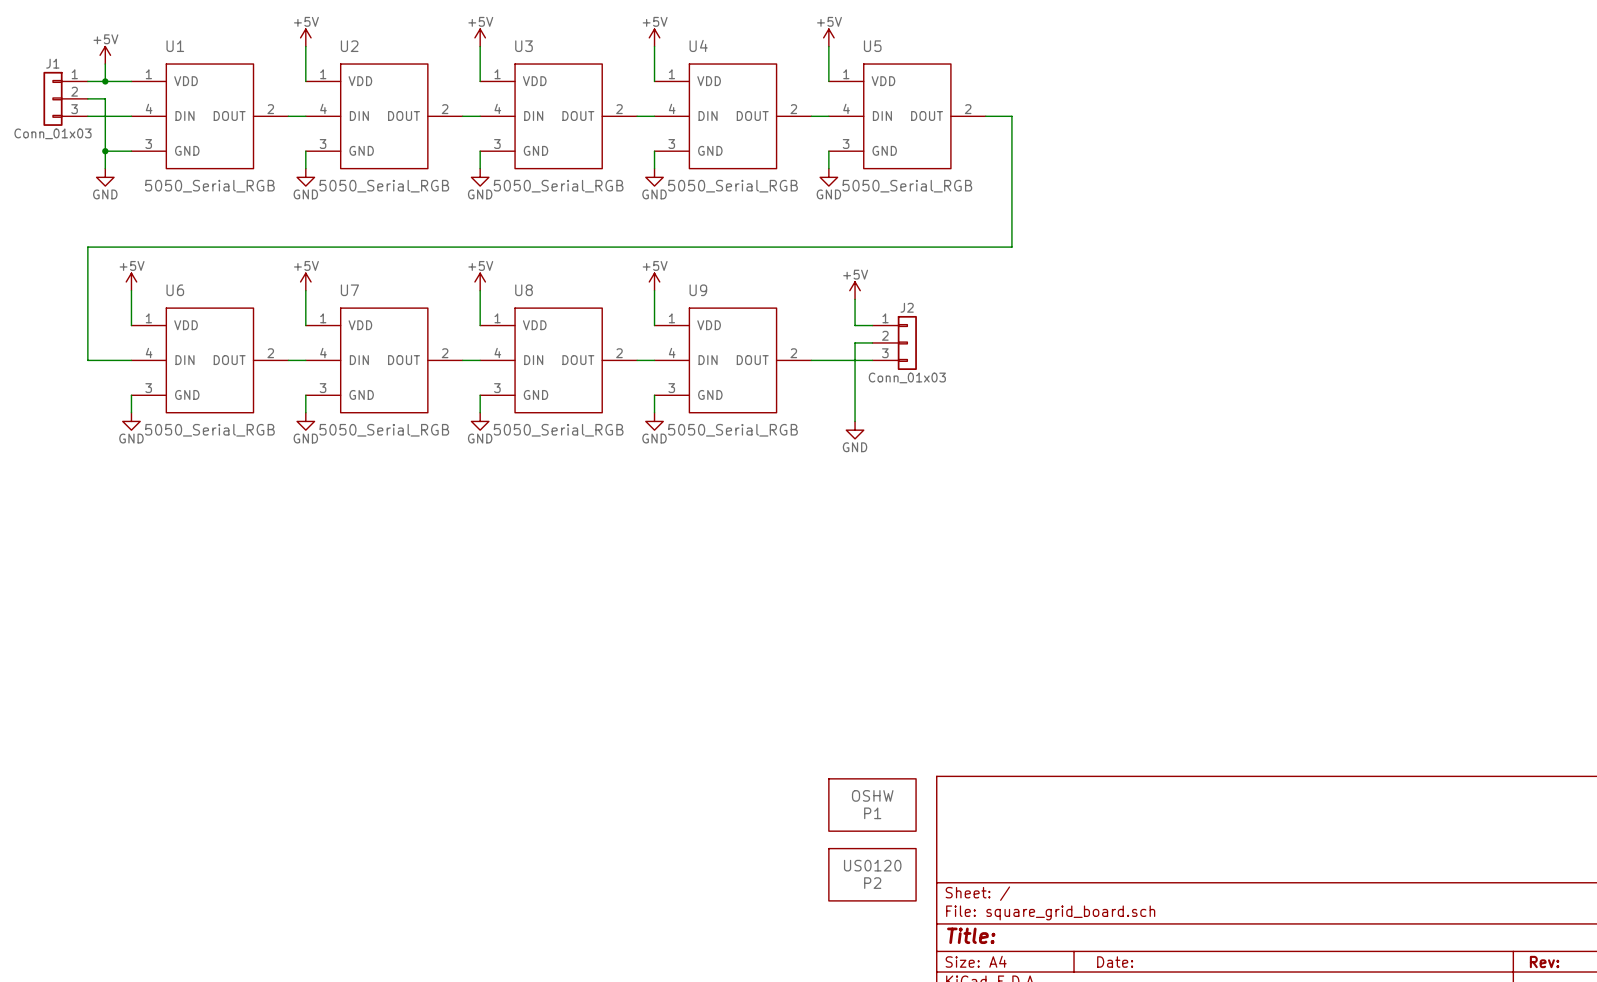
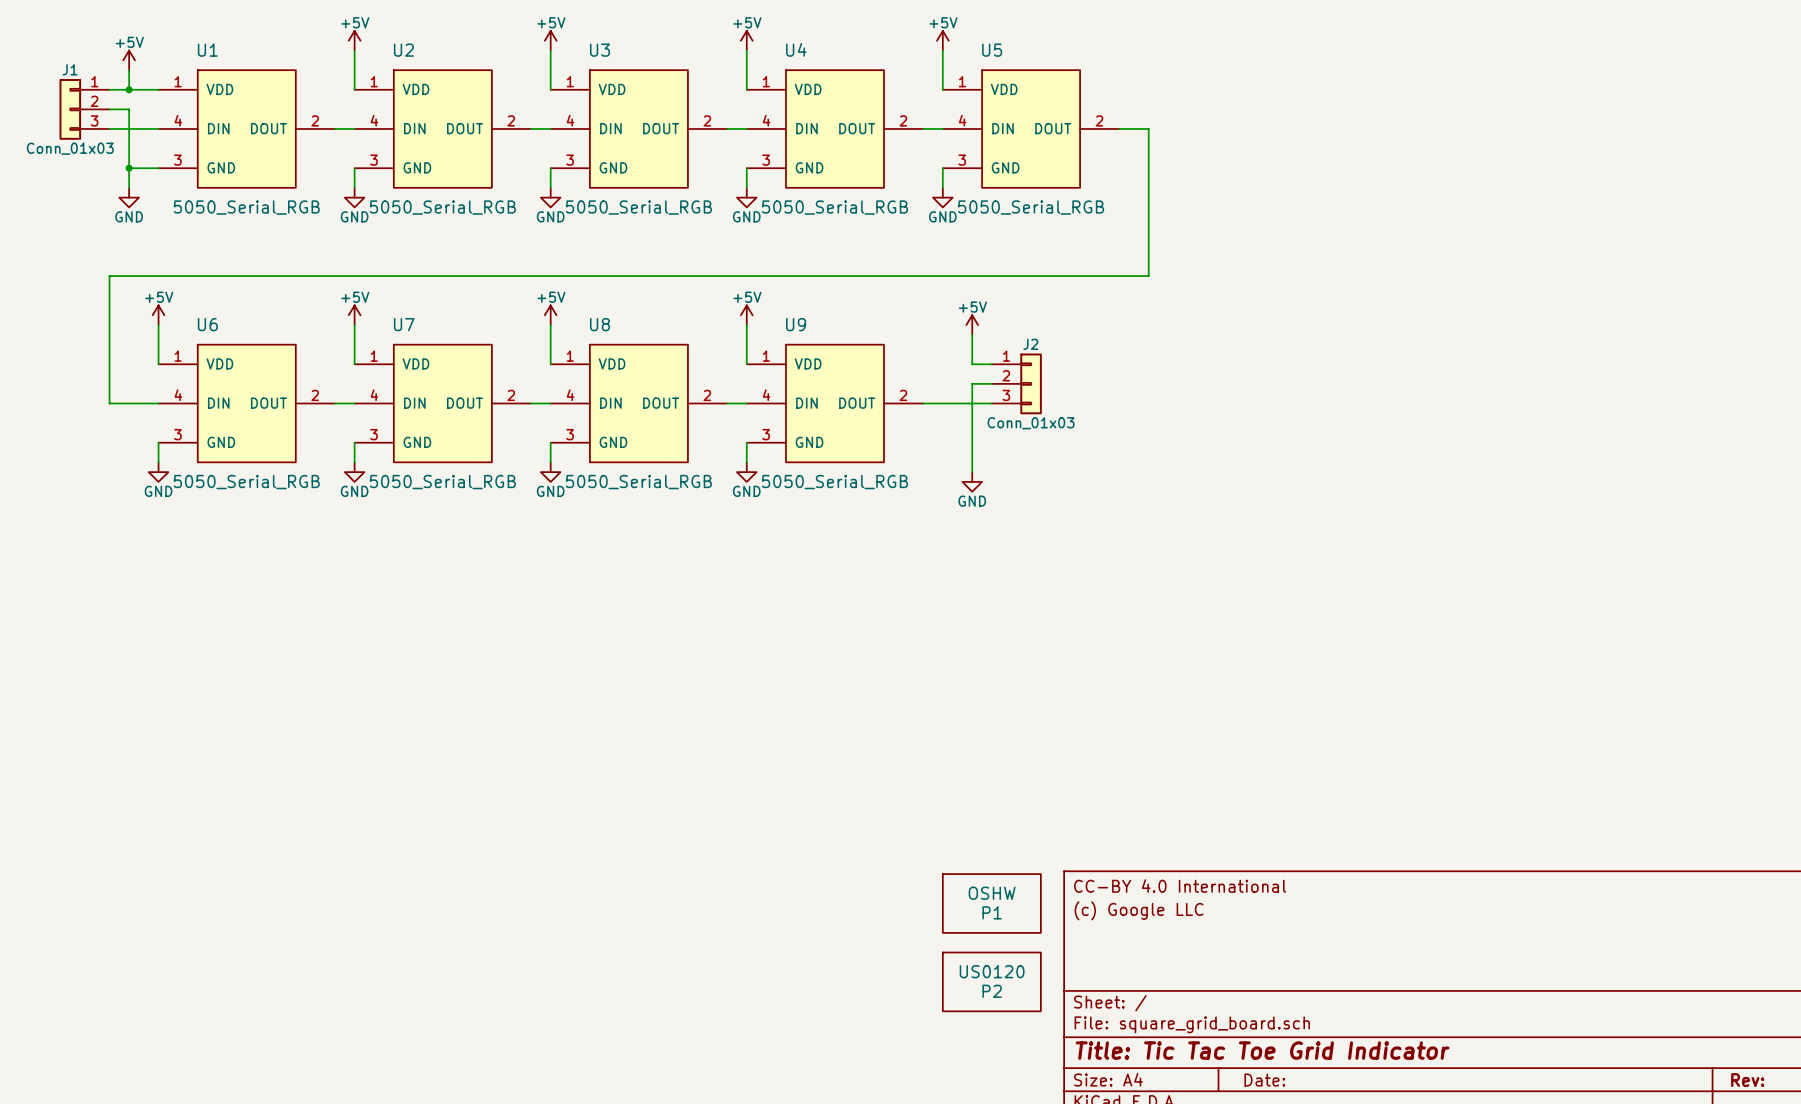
title block: none -> CC-BY 4.0 International (1180, 886)
title block: none -> (c) Google LLC (1139, 910)
title block: Title: (971, 935) -> Title: Tic Tac Toe Grid Indicator (1262, 1050)

